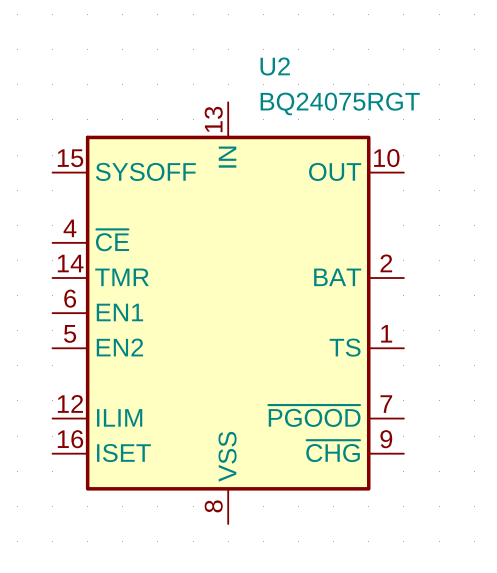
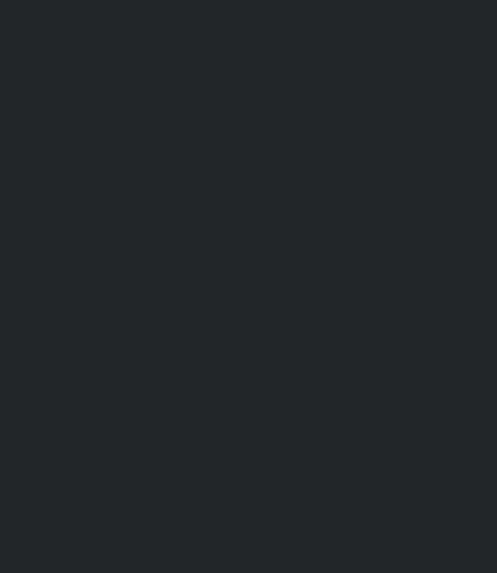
U2: BQ24075RGT (228, 313) -> none

